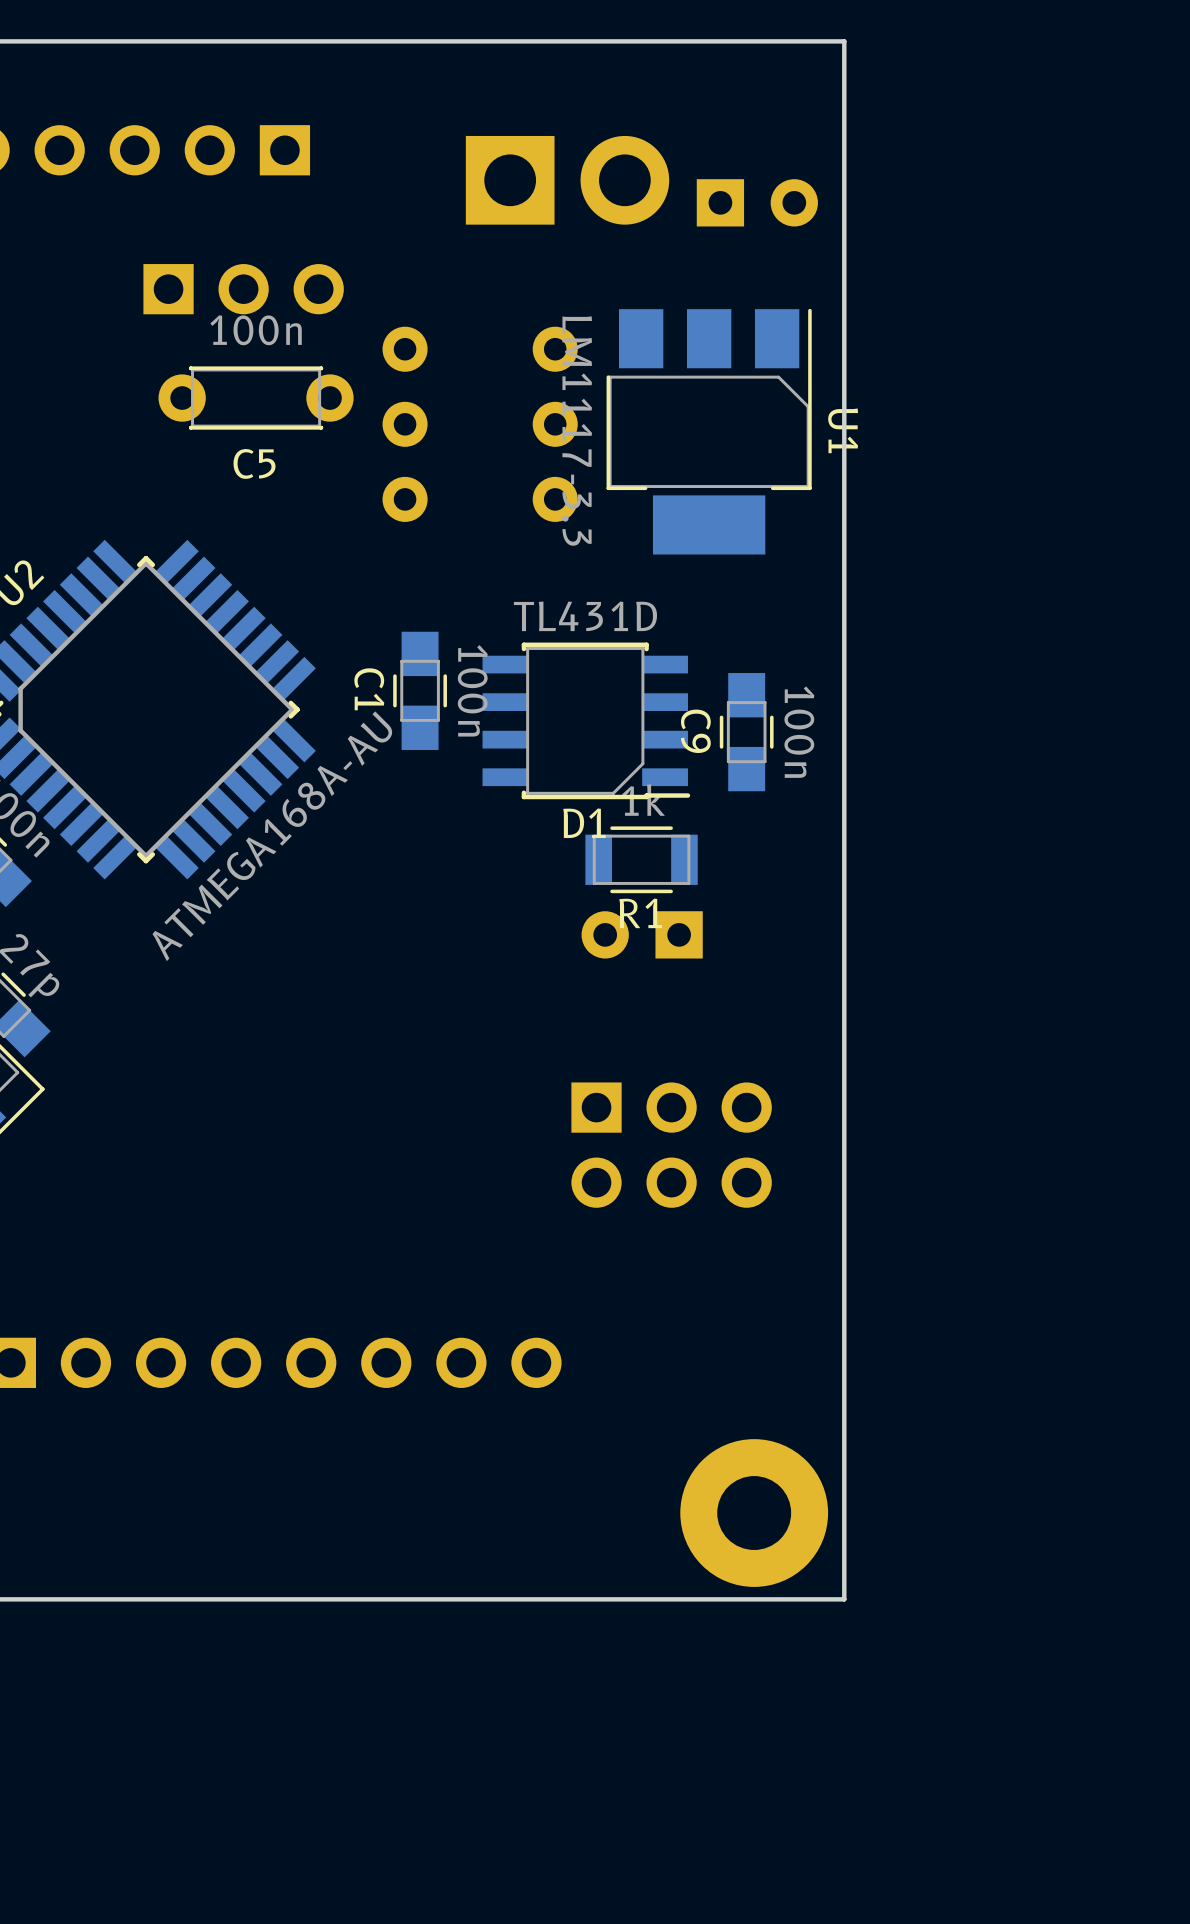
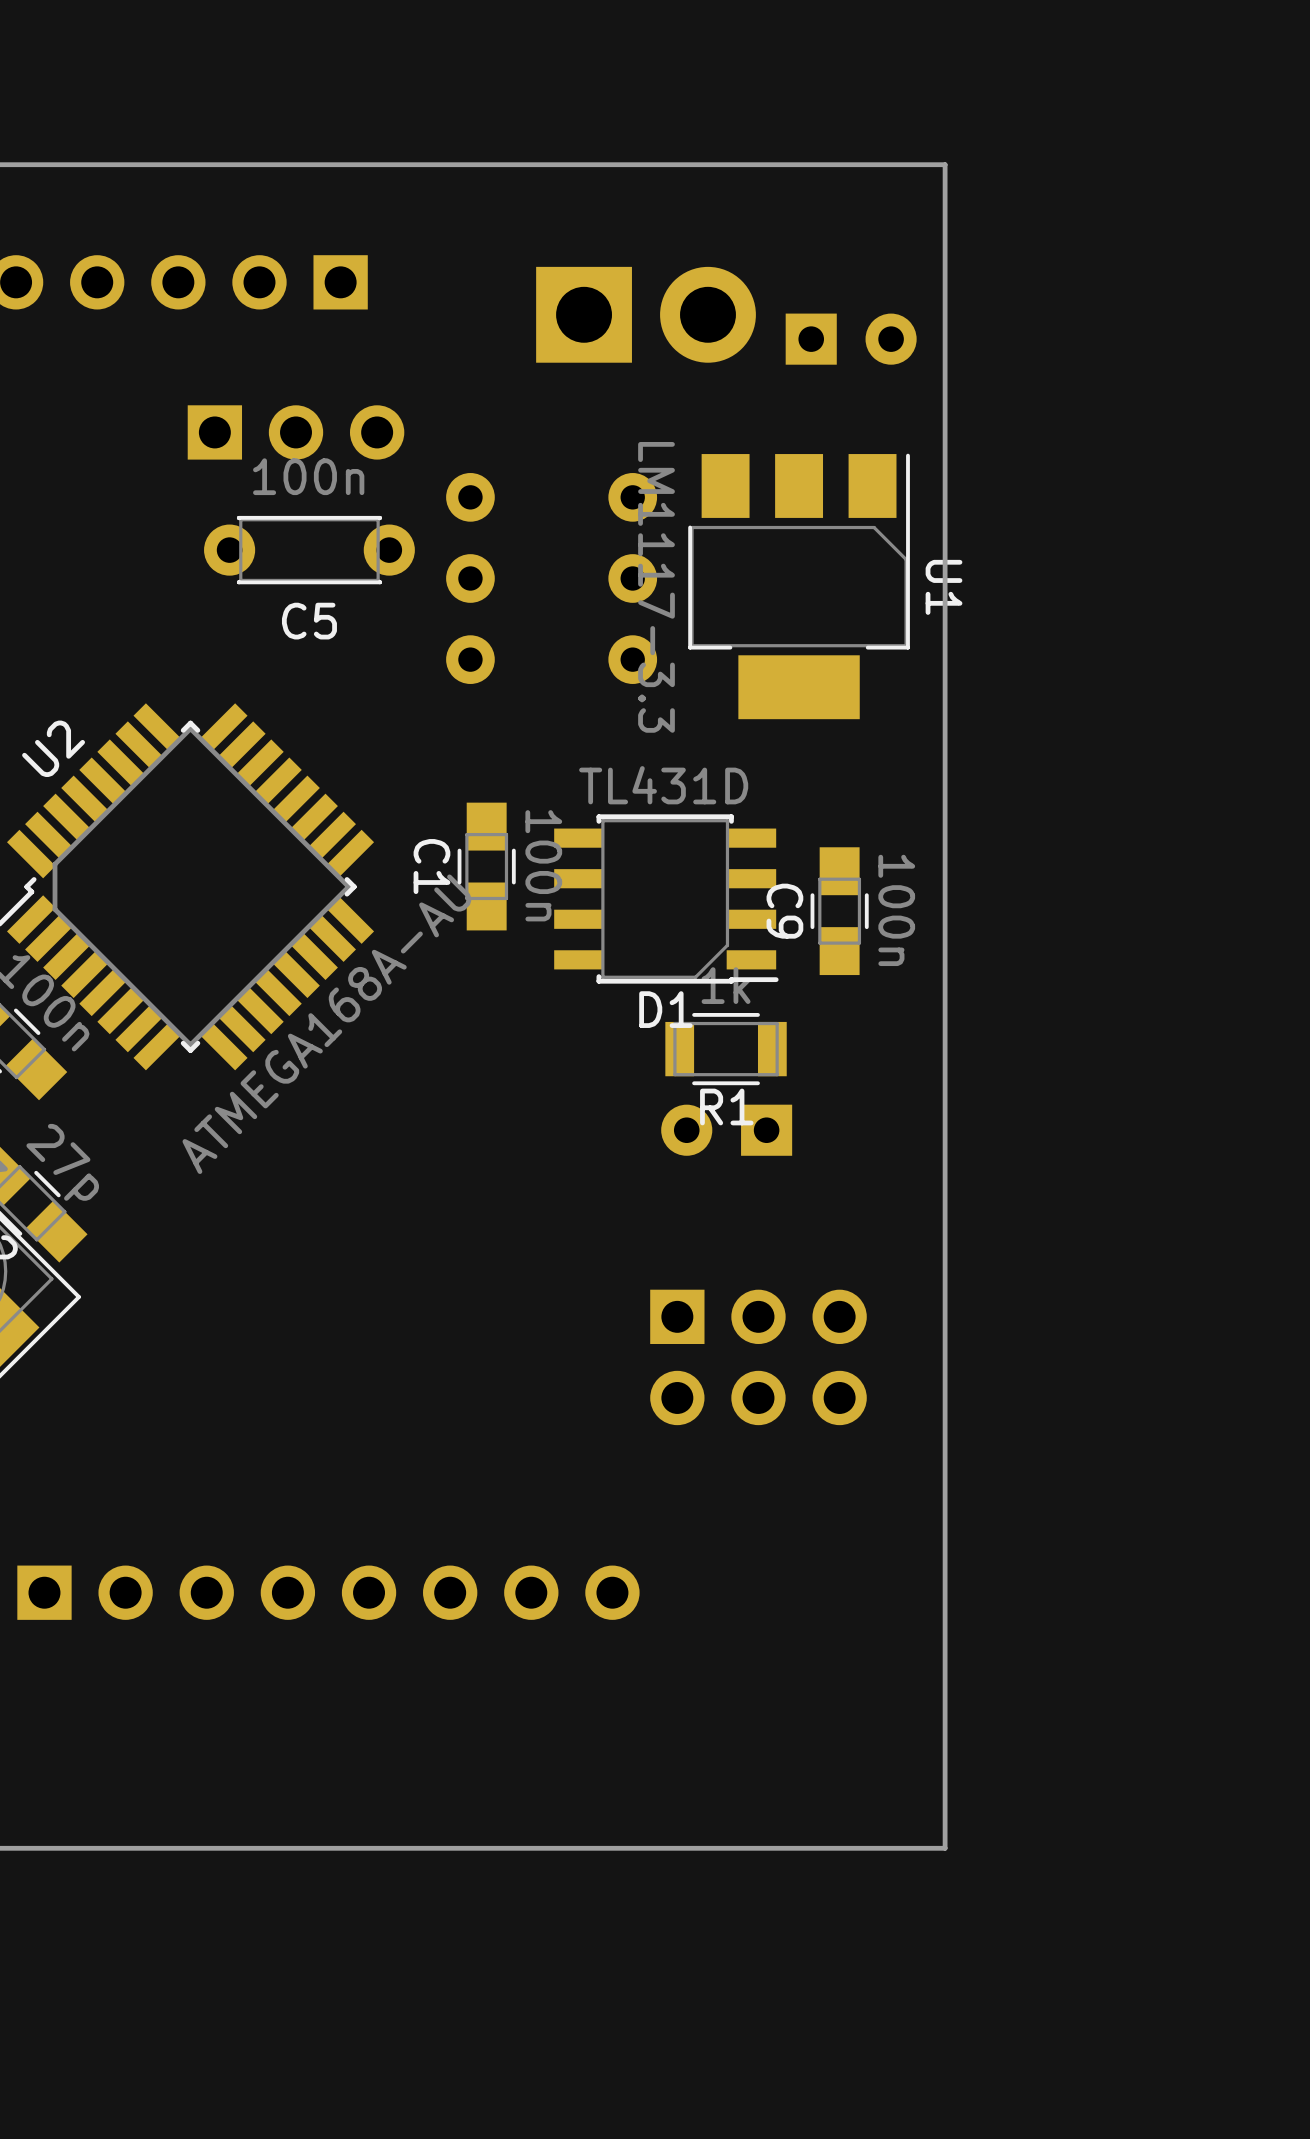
part: (754, 1513) -> none

